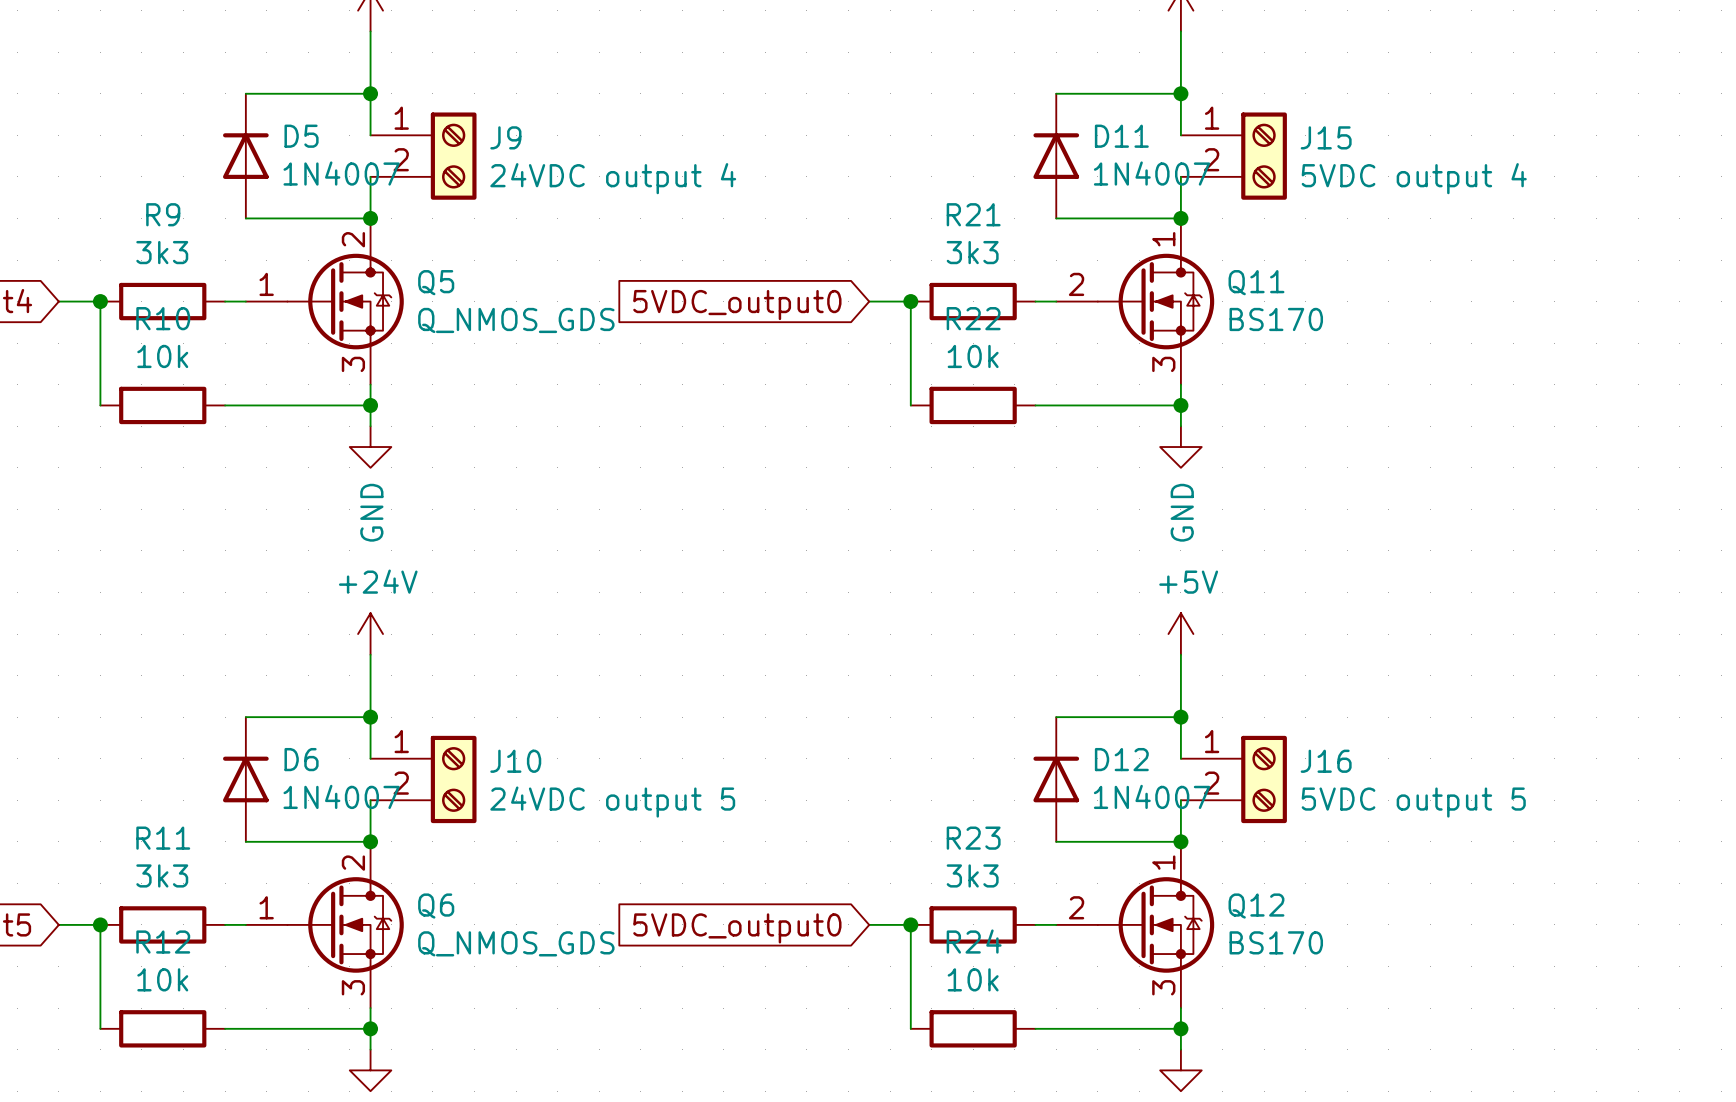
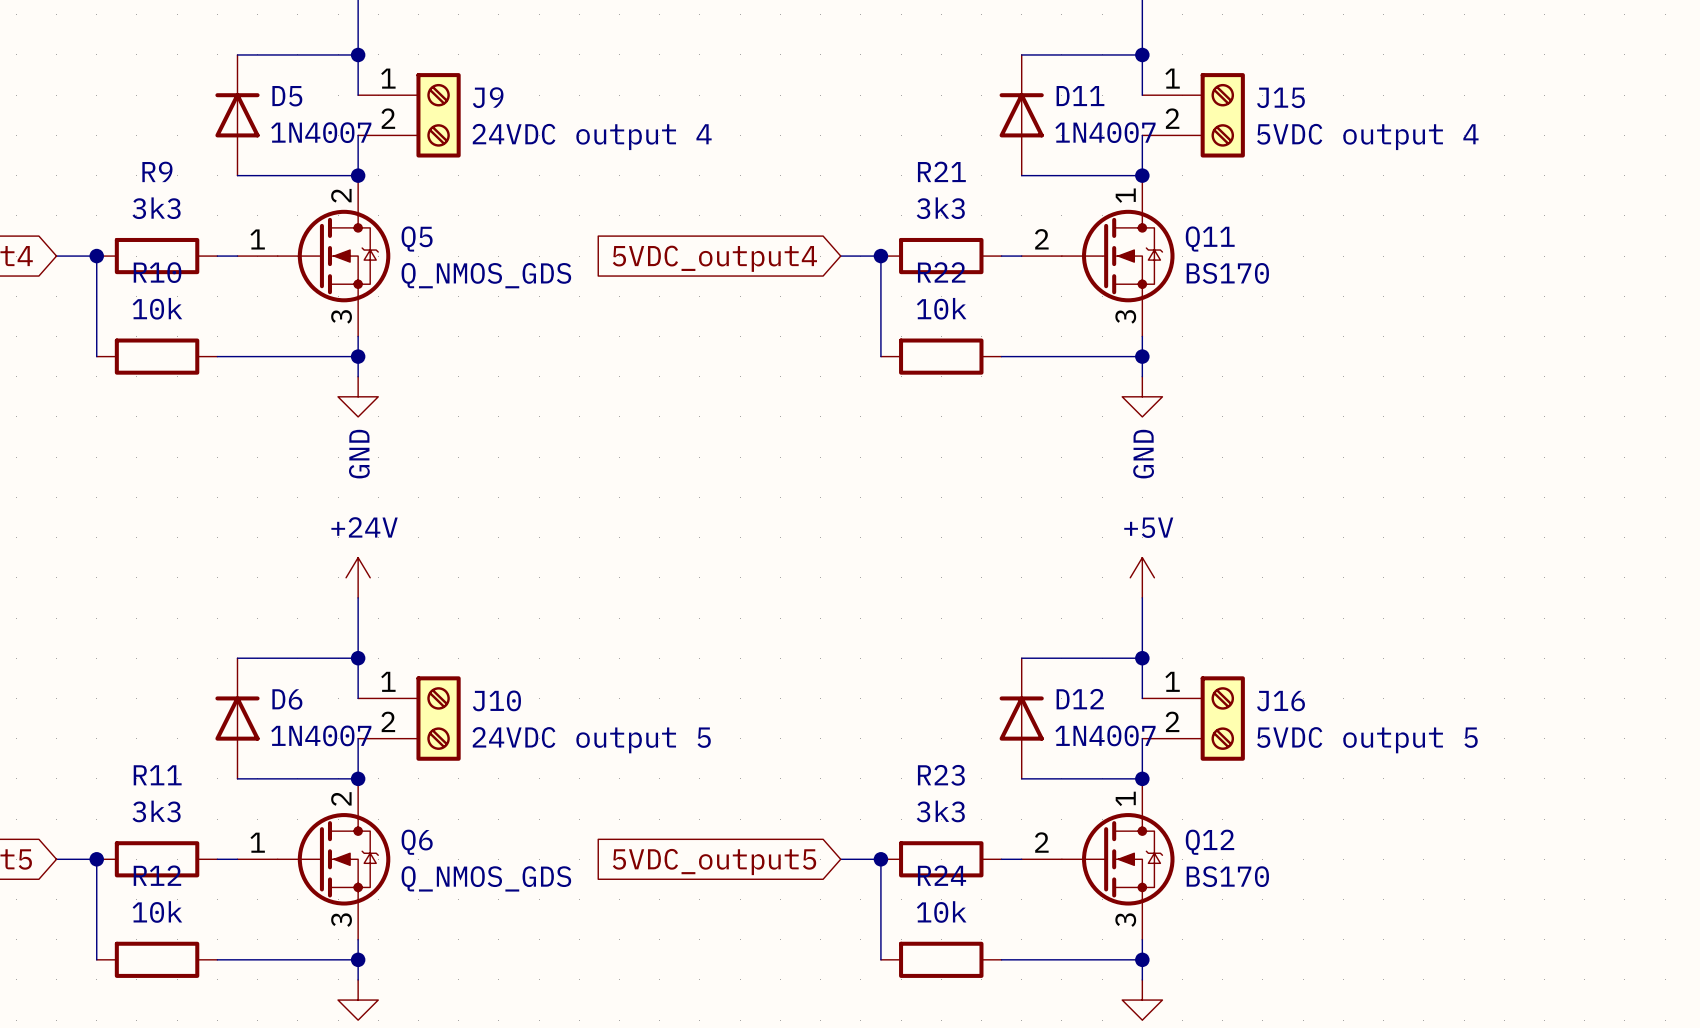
global label: 5VDC_output0 (737, 305) -> 5VDC_output4 (714, 258)
global label: 5VDC_output0 (737, 928) -> 5VDC_output5 (714, 862)

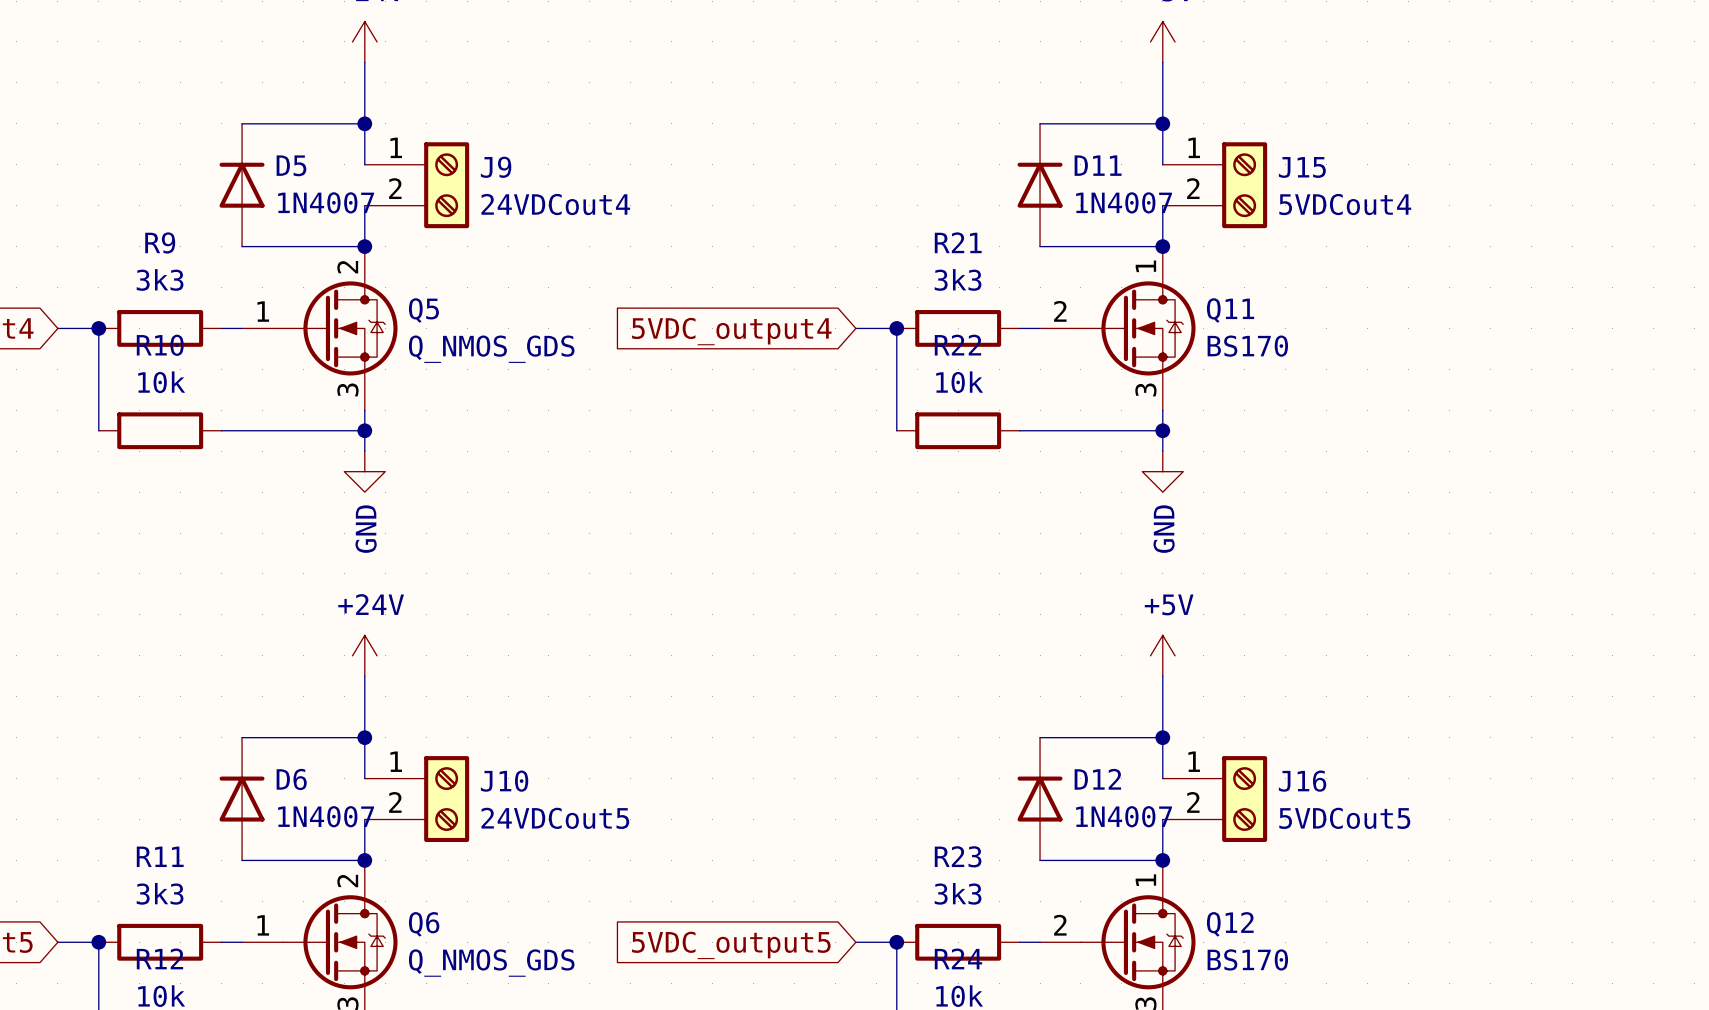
J9 value: 24VDC output 4 (592, 136) -> 24VDCout4 (555, 204)
J15 value: 5VDC output 4 (1367, 136) -> 5VDCout4 (1345, 204)
J10 value: 24VDC output 5 (591, 740) -> 24VDCout5 (555, 818)
J16 value: 5VDC output 5 (1367, 740) -> 5VDCout5 (1344, 818)

